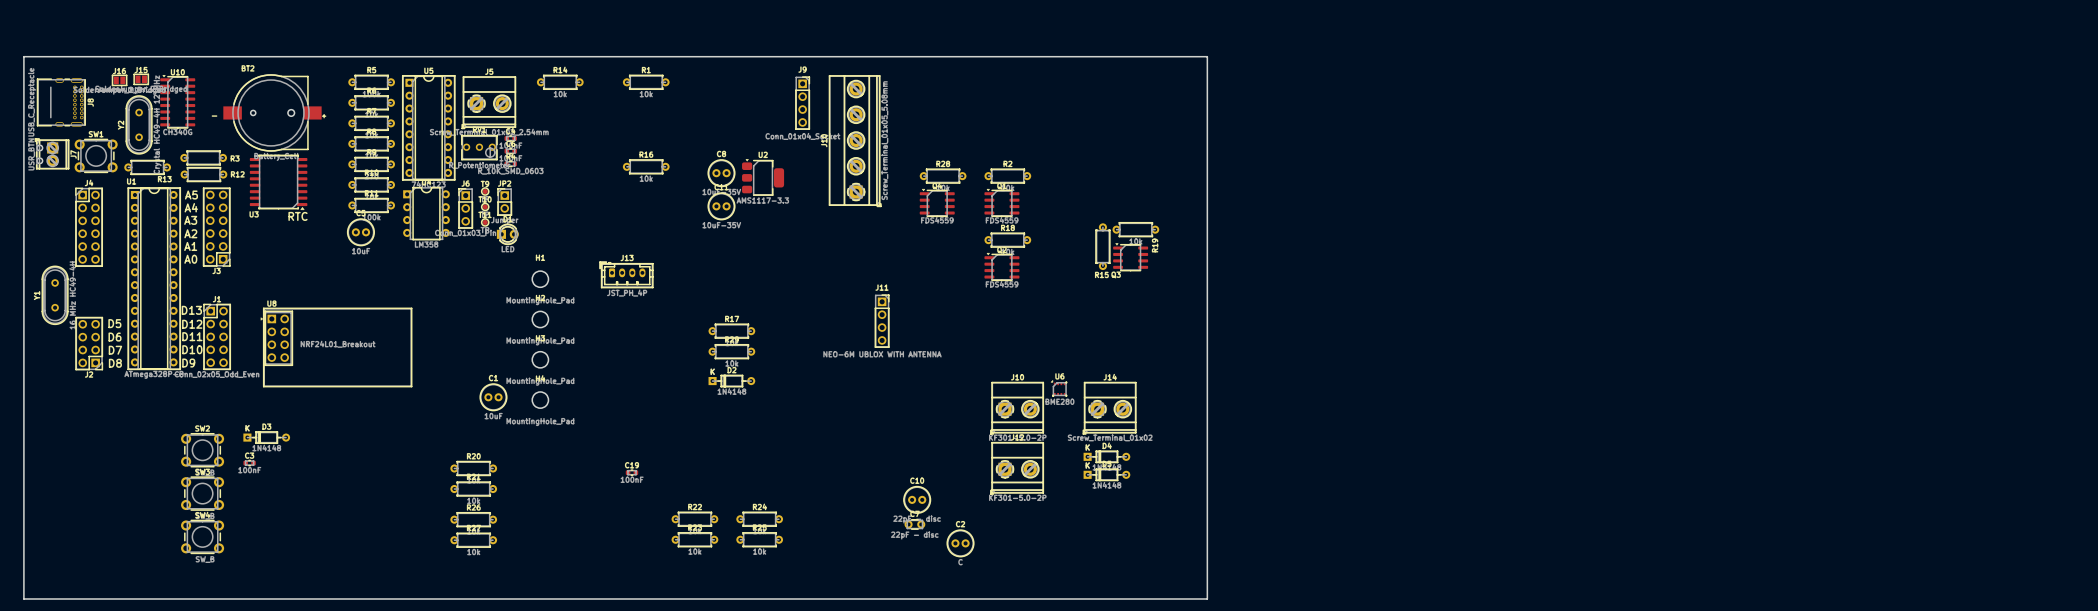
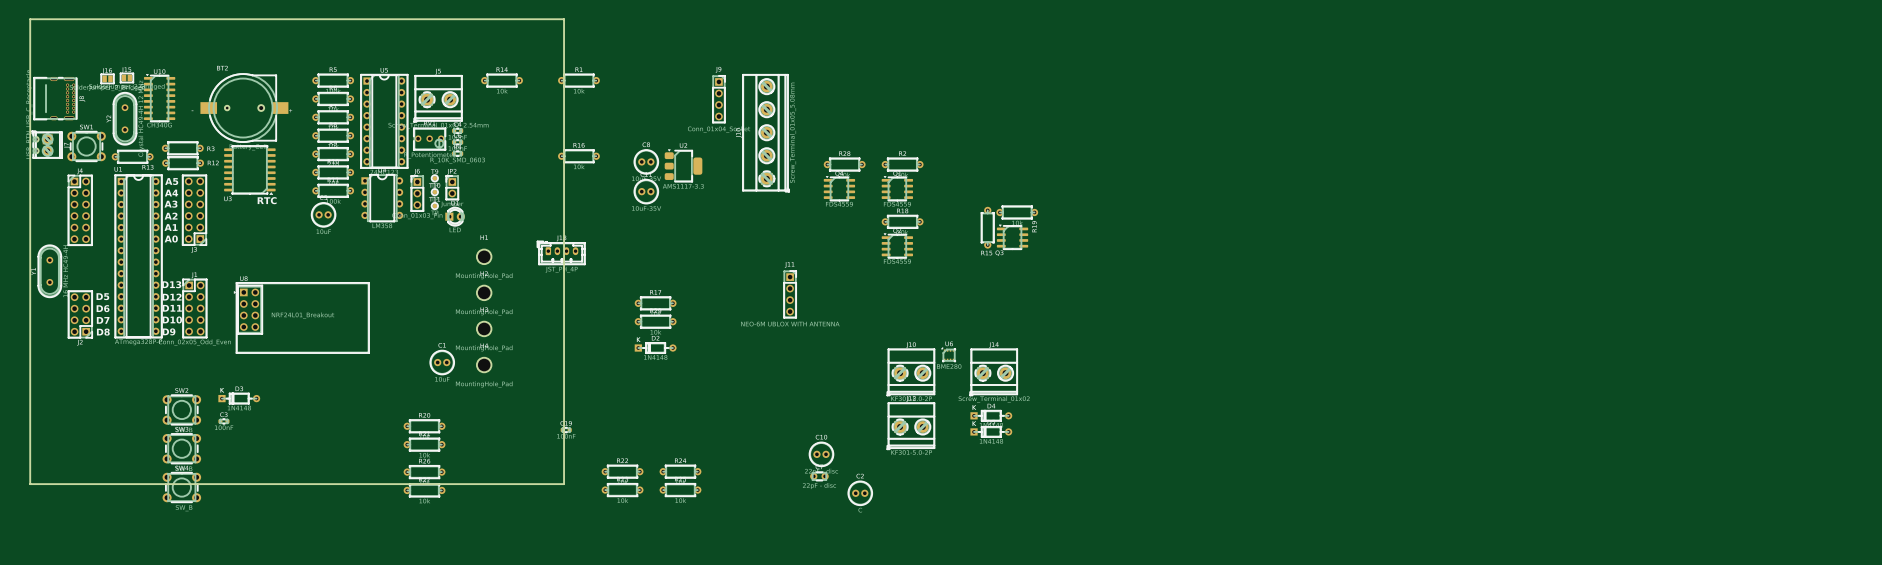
board edge: none -> (30, 19) (564, 19) (564, 484) (30, 484) (30, 19)
board edge: (23, 56) (1207, 56) (1207, 598) (23, 598) (23, 56) -> none

